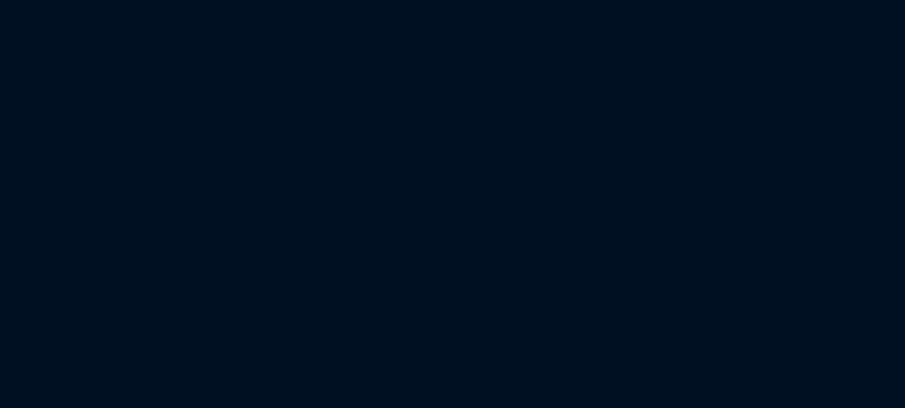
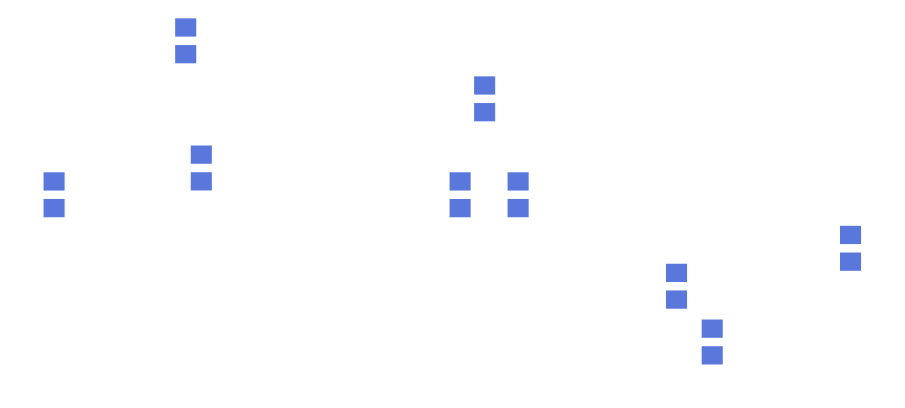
part: none -> (185, 40)
part: none -> (484, 98)
part: none -> (201, 167)
part: none -> (54, 194)
part: none -> (460, 194)
part: none -> (518, 194)
part: none -> (850, 248)
part: none -> (676, 286)
part: none -> (712, 342)

